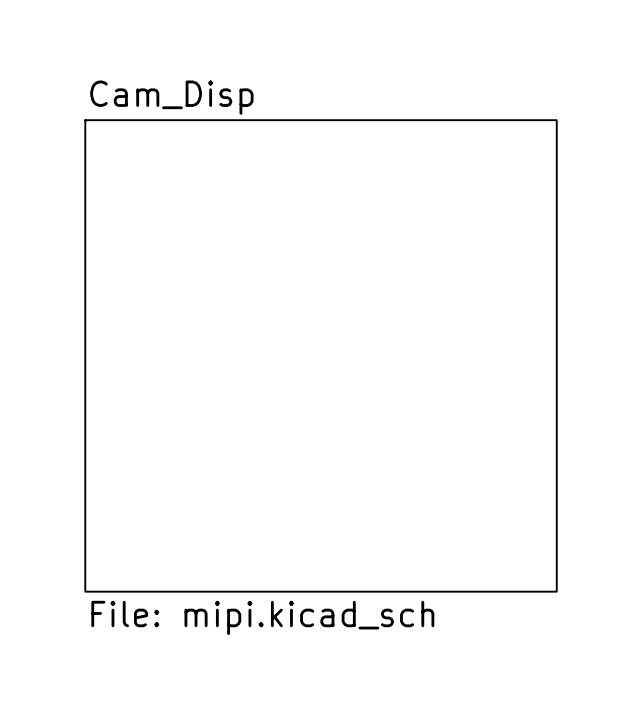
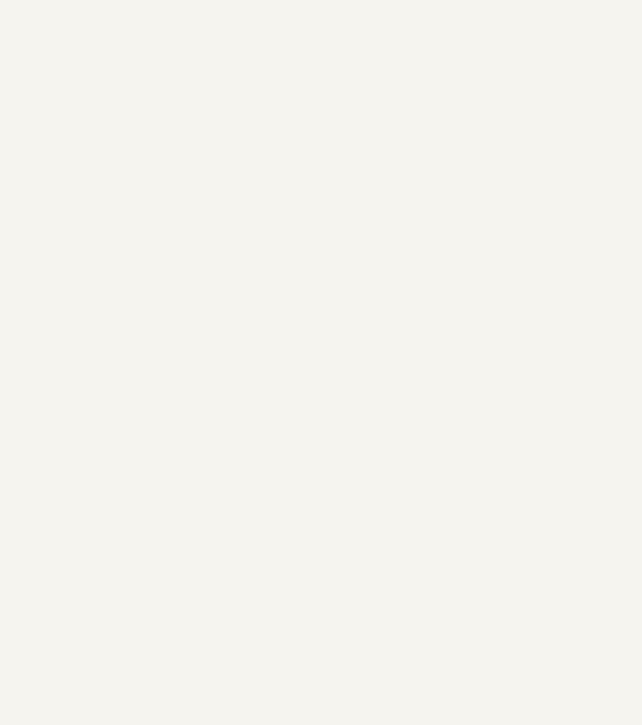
sheet Cam_Disp: File: mipi.kicad_sch (321, 355) -> none

